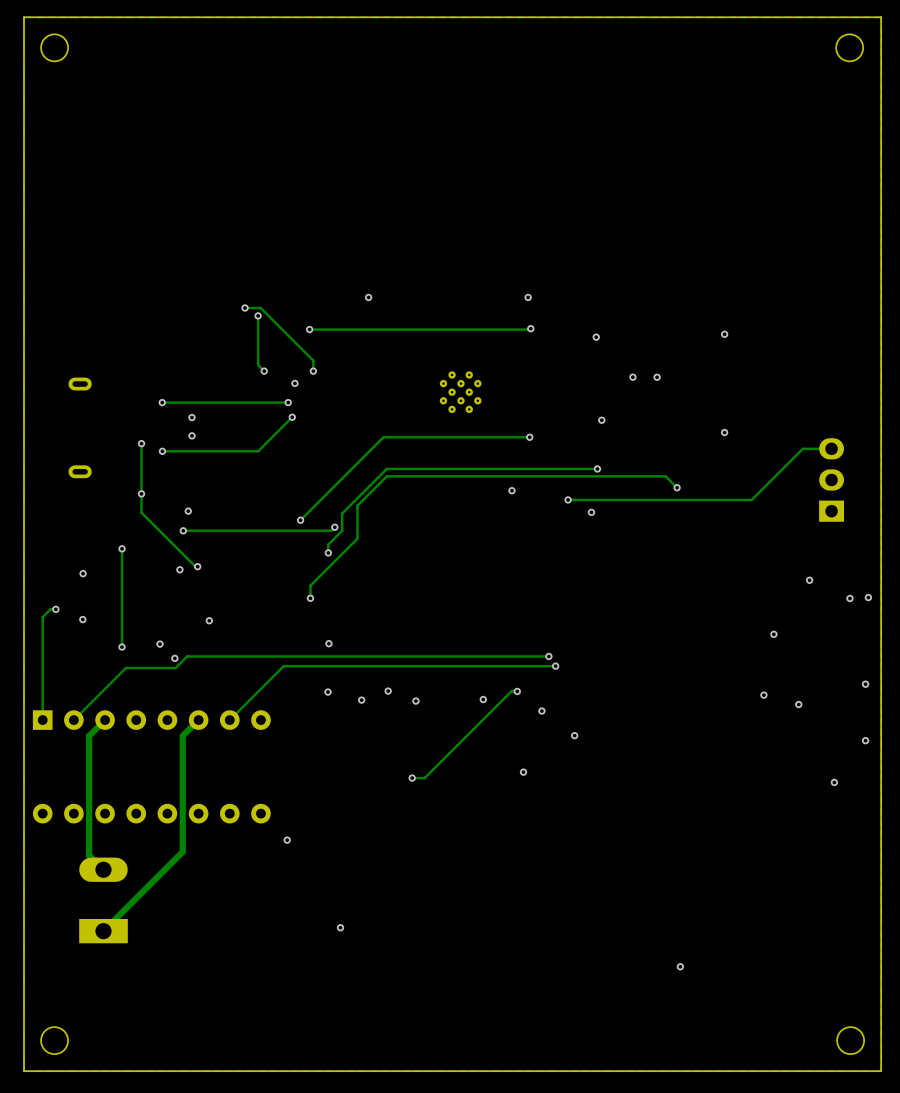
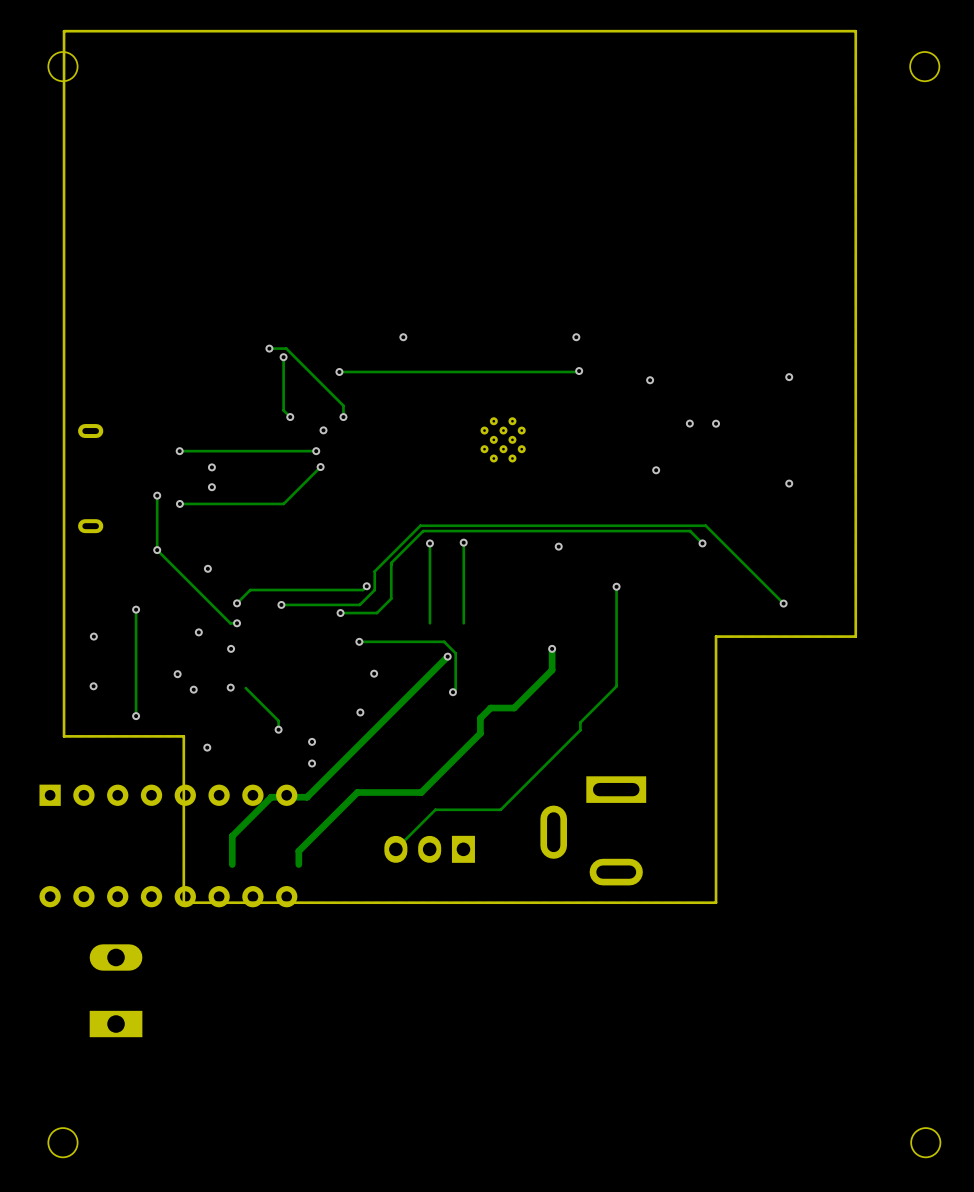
board edge: (881, 17) (24, 17) (24, 1071) (881, 1071) (881, 17) -> (855, 31) (855, 636) (716, 636) (716, 902) (183, 902) (183, 736) (64, 736) (64, 31) (855, 31)
track: (529, 437) (383, 437) (300, 520) -> none
via: (529, 437) -> none
track: (831, 448) (802, 448) (751, 499) (568, 499) -> none
track: (597, 468) (386, 468) (384, 471) -> (783, 603) (705, 525) (420, 525)
via: (597, 468) -> none
track: (633, 476) (665, 476) (677, 487) -> (690, 531) (702, 543)
part: (831, 479) -> none
track: none -> (429, 543) (429, 623)
via: none -> (429, 543)
track: none -> (463, 542) (463, 623)
via: none -> (463, 542)
via: none -> (702, 543)
via: (677, 487) -> none
track: (141, 493) (141, 512) (195, 566) (197, 566) -> (157, 550) (230, 623) (237, 623)
via: (568, 499) -> none
via: (591, 512) -> none
via: (300, 520) -> none
track: none -> (616, 586) (616, 686) (580, 722) (580, 730) (500, 809) (435, 809) (395, 849)
via: none -> (616, 586)
via: (183, 530) -> none
track: (227, 530) (183, 530) -> (250, 590) (237, 603)
via: none -> (237, 603)
via: none -> (783, 603)
via: none -> (281, 604)
track: (328, 544) (328, 552) -> (359, 604) (281, 604)
via: none -> (340, 613)
track: (344, 551) (310, 585) (310, 598) -> (376, 613) (340, 613)
via: (328, 552) -> none
via: none -> (237, 623)
via: (197, 566) -> none
track: none -> (359, 641) (444, 641) (455, 653) (455, 689) (452, 692)
via: none -> (359, 641)
via: (809, 580) -> none
via: none -> (231, 648)
track: none -> (552, 648) (552, 670) (514, 708) (490, 708) (480, 718) (480, 733) (421, 792) (357, 792) (298, 851) (298, 864)
via: none -> (552, 648)
track: none -> (447, 656) (307, 797) (271, 797) (232, 836) (232, 864)
via: none -> (447, 656)
via: (868, 597) -> none
via: (310, 598) -> none
via: (849, 598) -> none
via: none -> (374, 673)
via: none -> (177, 674)
track: (55, 609) (50, 609) (42, 617) (42, 720) -> none
via: (55, 609) -> none
track: none -> (245, 688) (278, 720) (278, 729)
via: none -> (193, 689)
via: none -> (452, 692)
via: (773, 634) -> none
via: (160, 644) -> none
track: (548, 656) (187, 656) (175, 668) (125, 668) (73, 720) -> none
via: (548, 656) -> none
via: (174, 658) -> none
via: none -> (278, 729)
track: (555, 666) (283, 666) (229, 720) -> none
via: (555, 666) -> none
via: none -> (312, 741)
via: none -> (207, 747)
via: (865, 684) -> none
via: none -> (312, 763)
via: (388, 691) -> none
track: (517, 691) (511, 691) (424, 778) (412, 778) -> none
via: (517, 691) -> none
via: (328, 692) -> none
via: (763, 695) -> none
via: (483, 699) -> none
via: (361, 700) -> none
via: (415, 701) -> none
via: (798, 704) -> none
via: (541, 711) -> none
track: (105, 720) (89, 735) (89, 855) (103, 869) -> none
track: (198, 720) (182, 735) (182, 851) (103, 931) -> none
via: (574, 735) -> none
via: (865, 740) -> none
part: none -> (593, 830)
part: none -> (429, 849)
via: (523, 772) -> none
via: (412, 778) -> none
via: (834, 782) -> none
via: (287, 840) -> none
via: (340, 927) -> none
via: (680, 966) -> none

